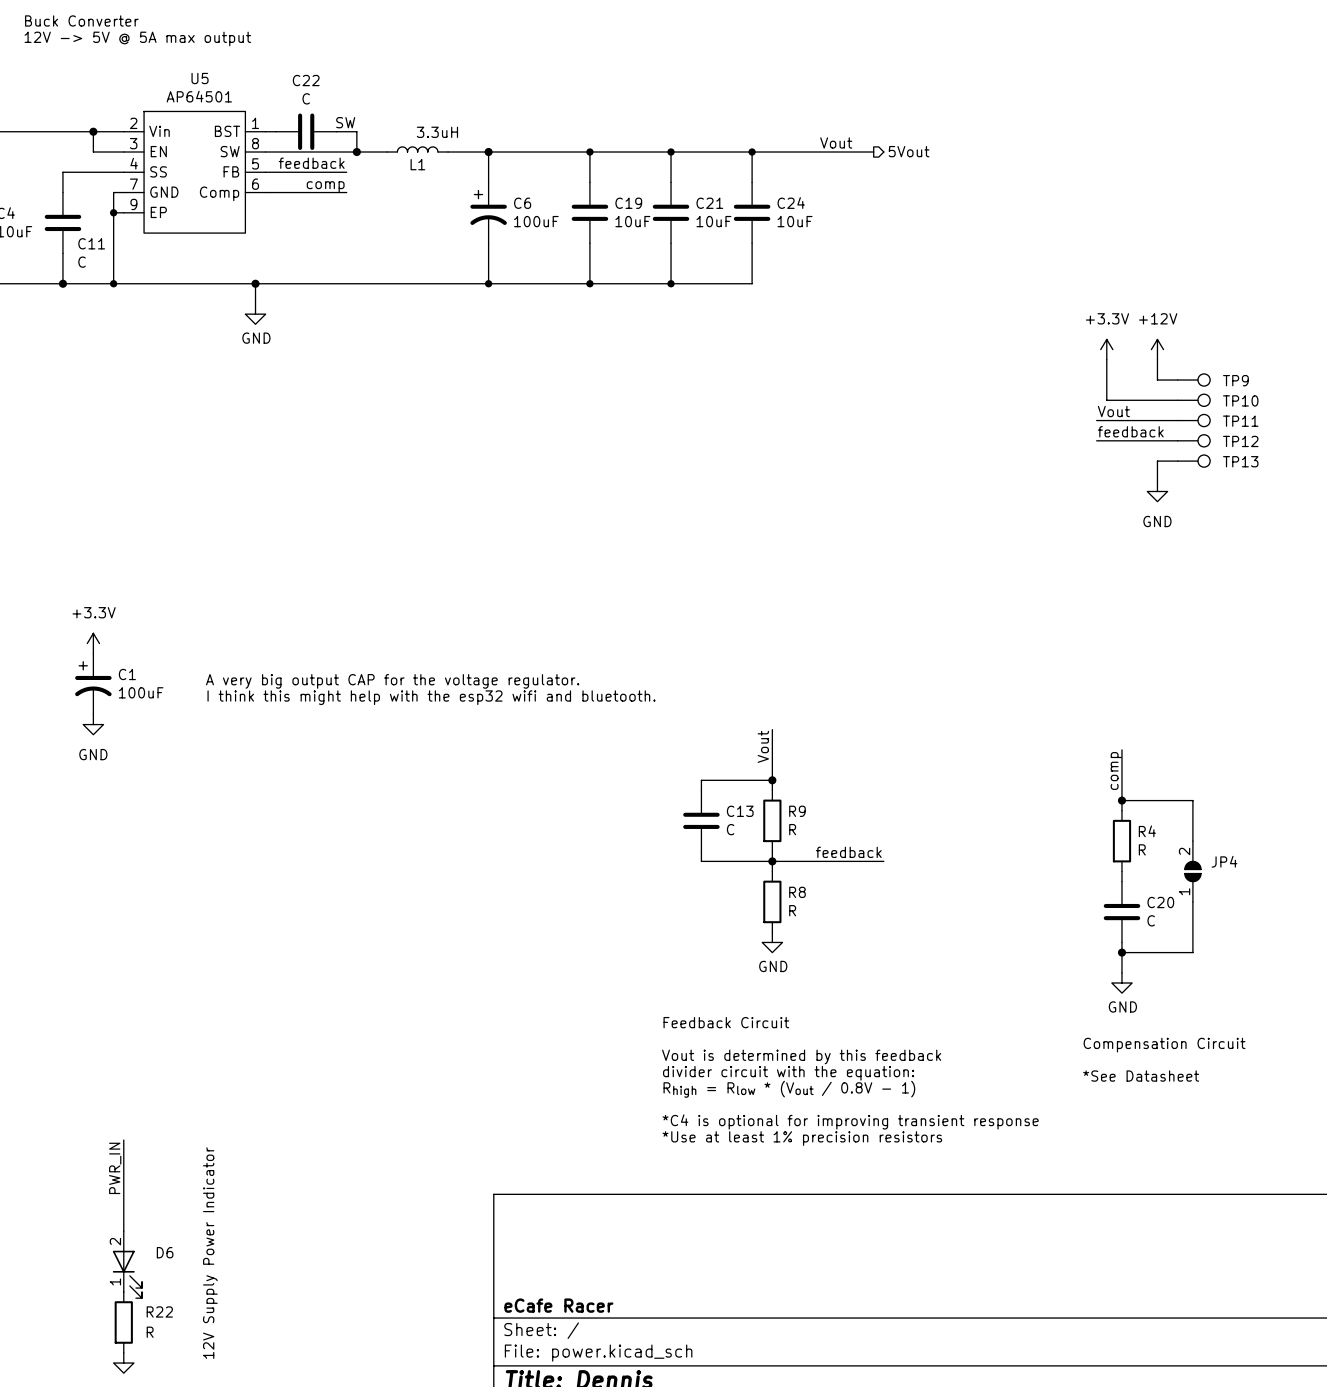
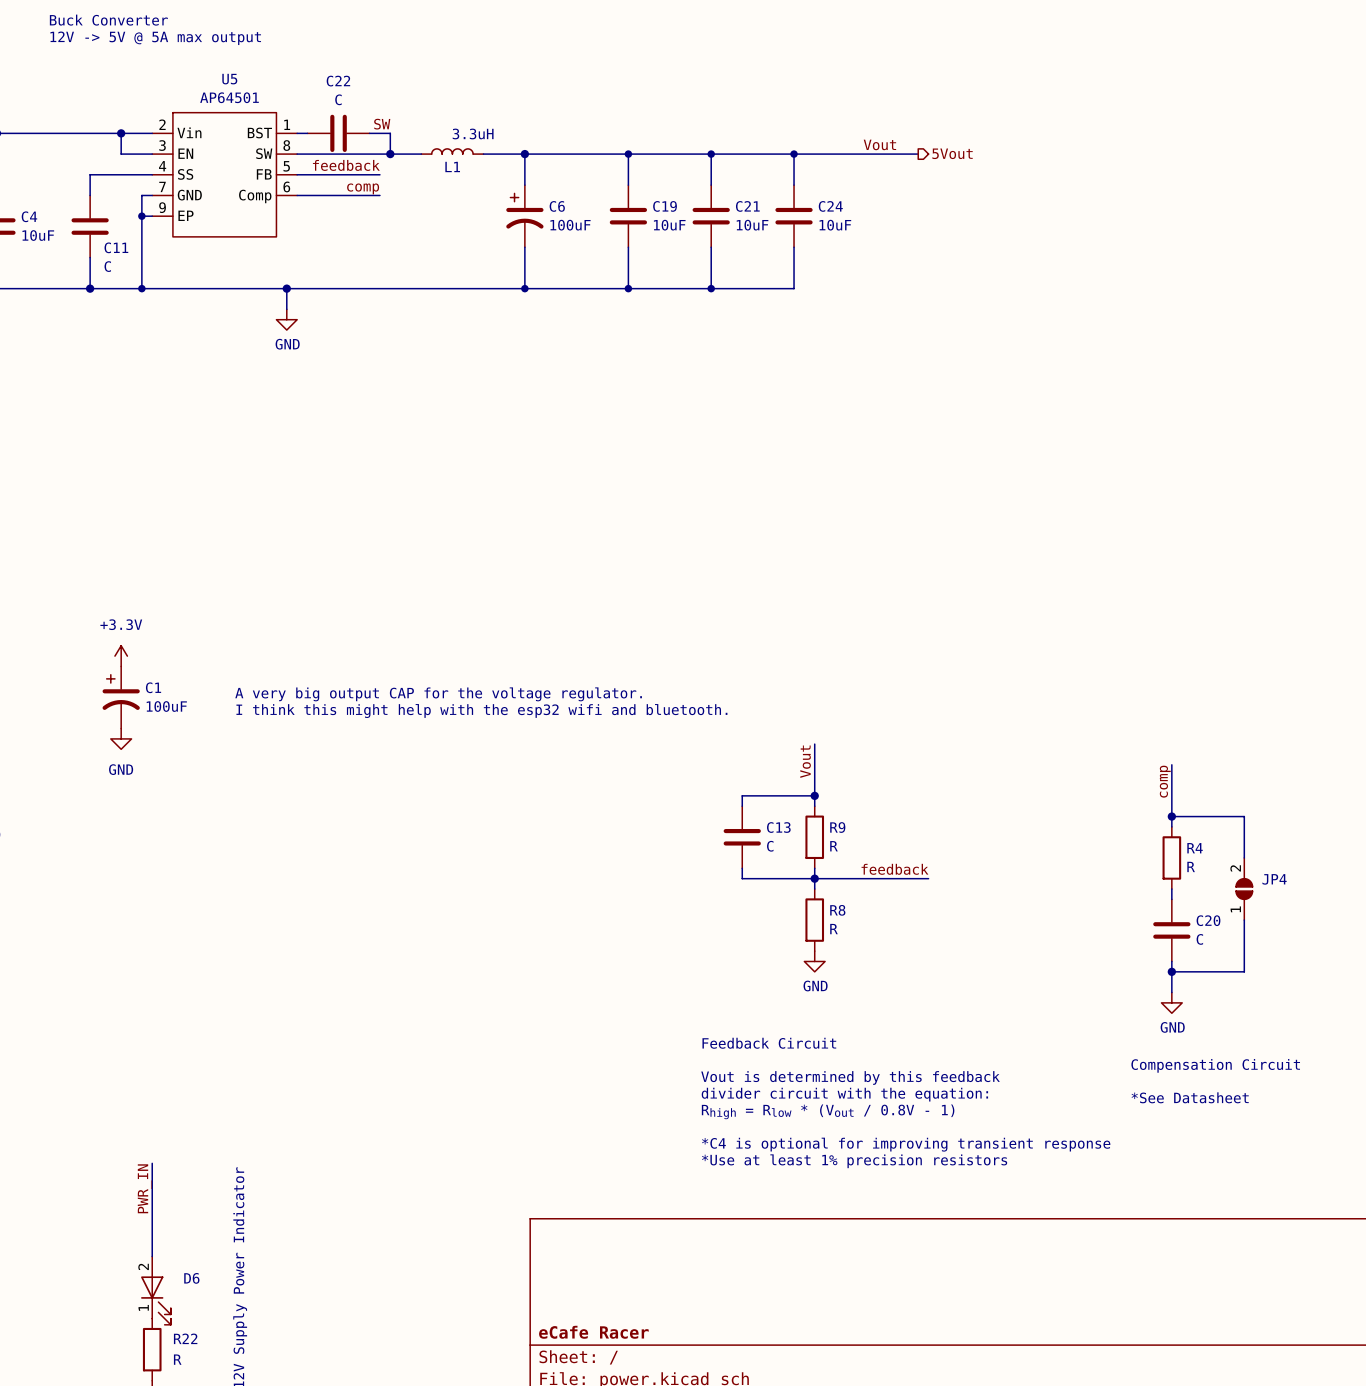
power symbol: +3.3V (1106, 349) -> none
power symbol: +12V (1157, 349) -> none
wire: (1106, 359) (1106, 400) (1177, 400) -> none
wire: (1157, 359) (1157, 380) (1177, 380) -> none
TP9: (1193, 380) -> none
TP10: (1193, 400) -> none
label: Vout (1113, 411) -> none
wire: (1096, 420) (1177, 420) -> none
TP11: (1193, 420) -> none
label: feedback (1130, 431) -> none
wire: (1096, 440) (1177, 440) -> none
TP12: (1193, 440) -> none
wire: (1177, 461) (1157, 461) (1157, 481) -> none
TP13: (1193, 461) -> none
power symbol: GND (1157, 491) -> none

